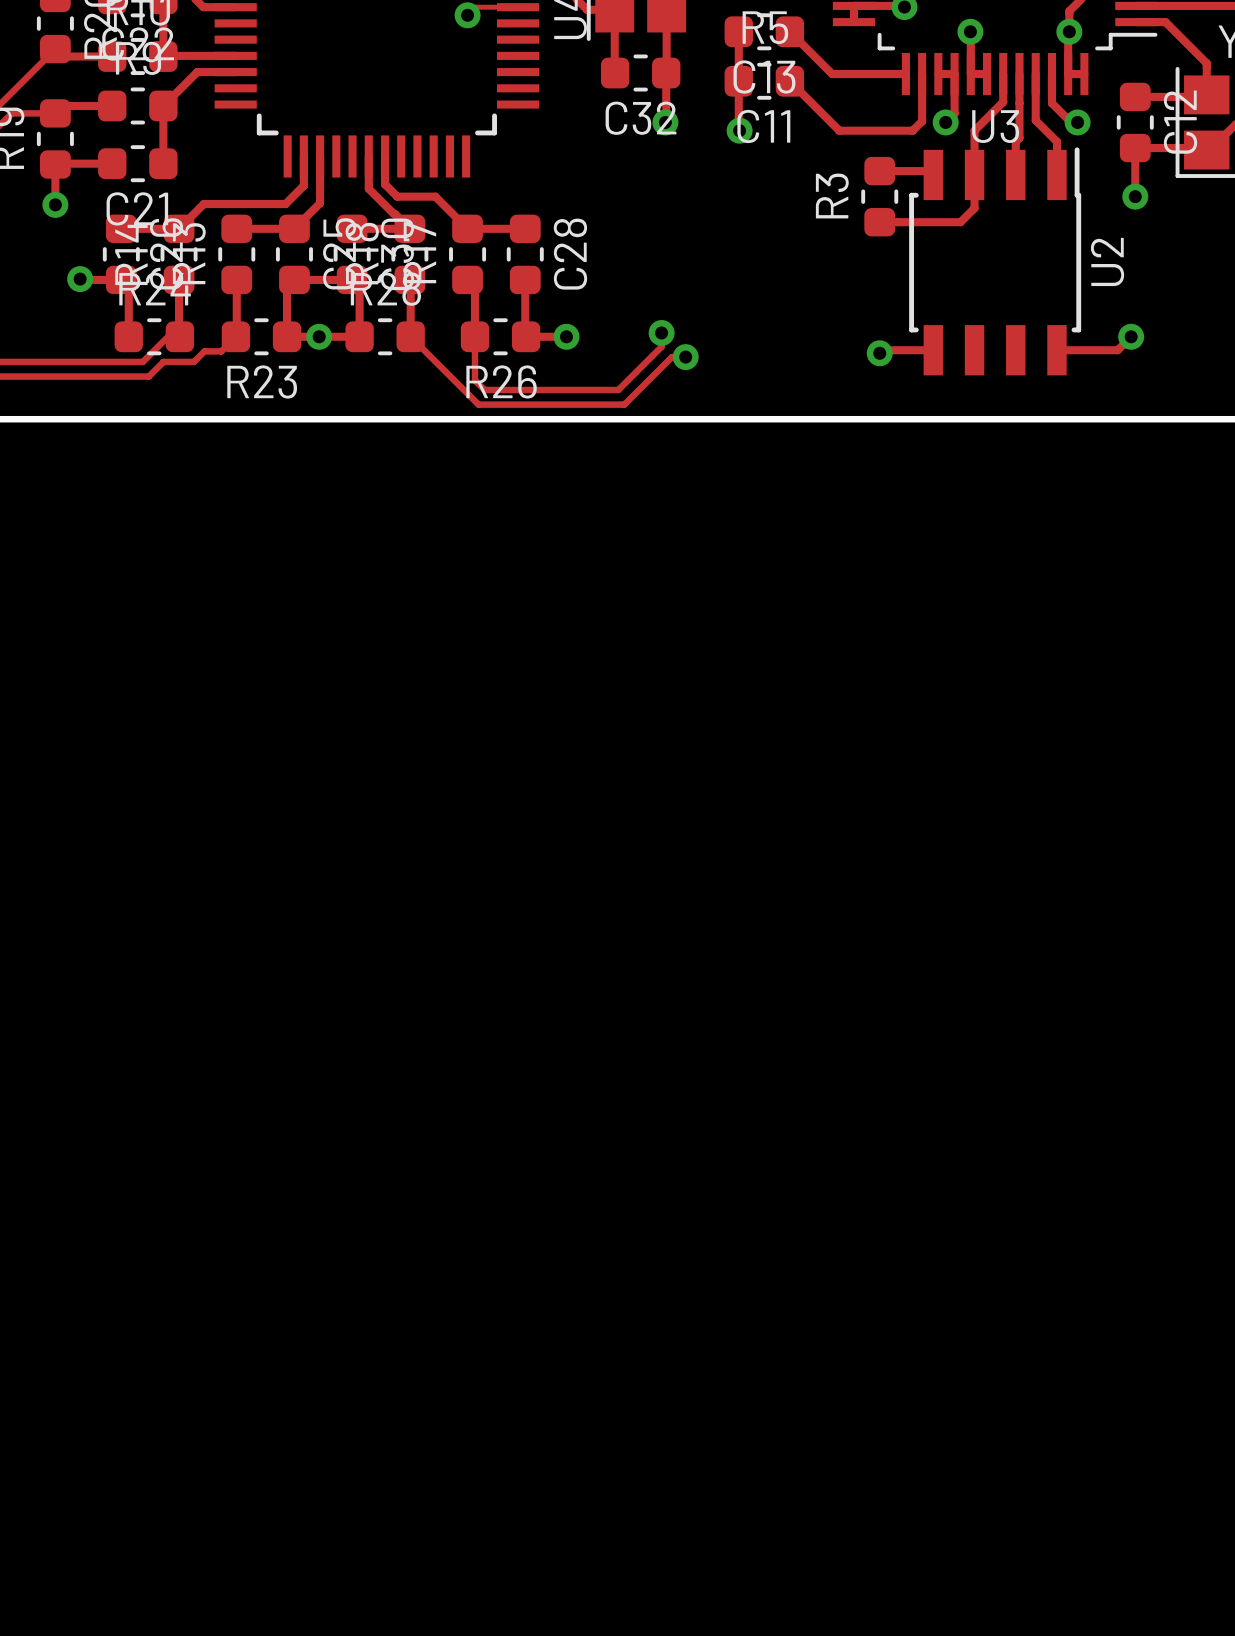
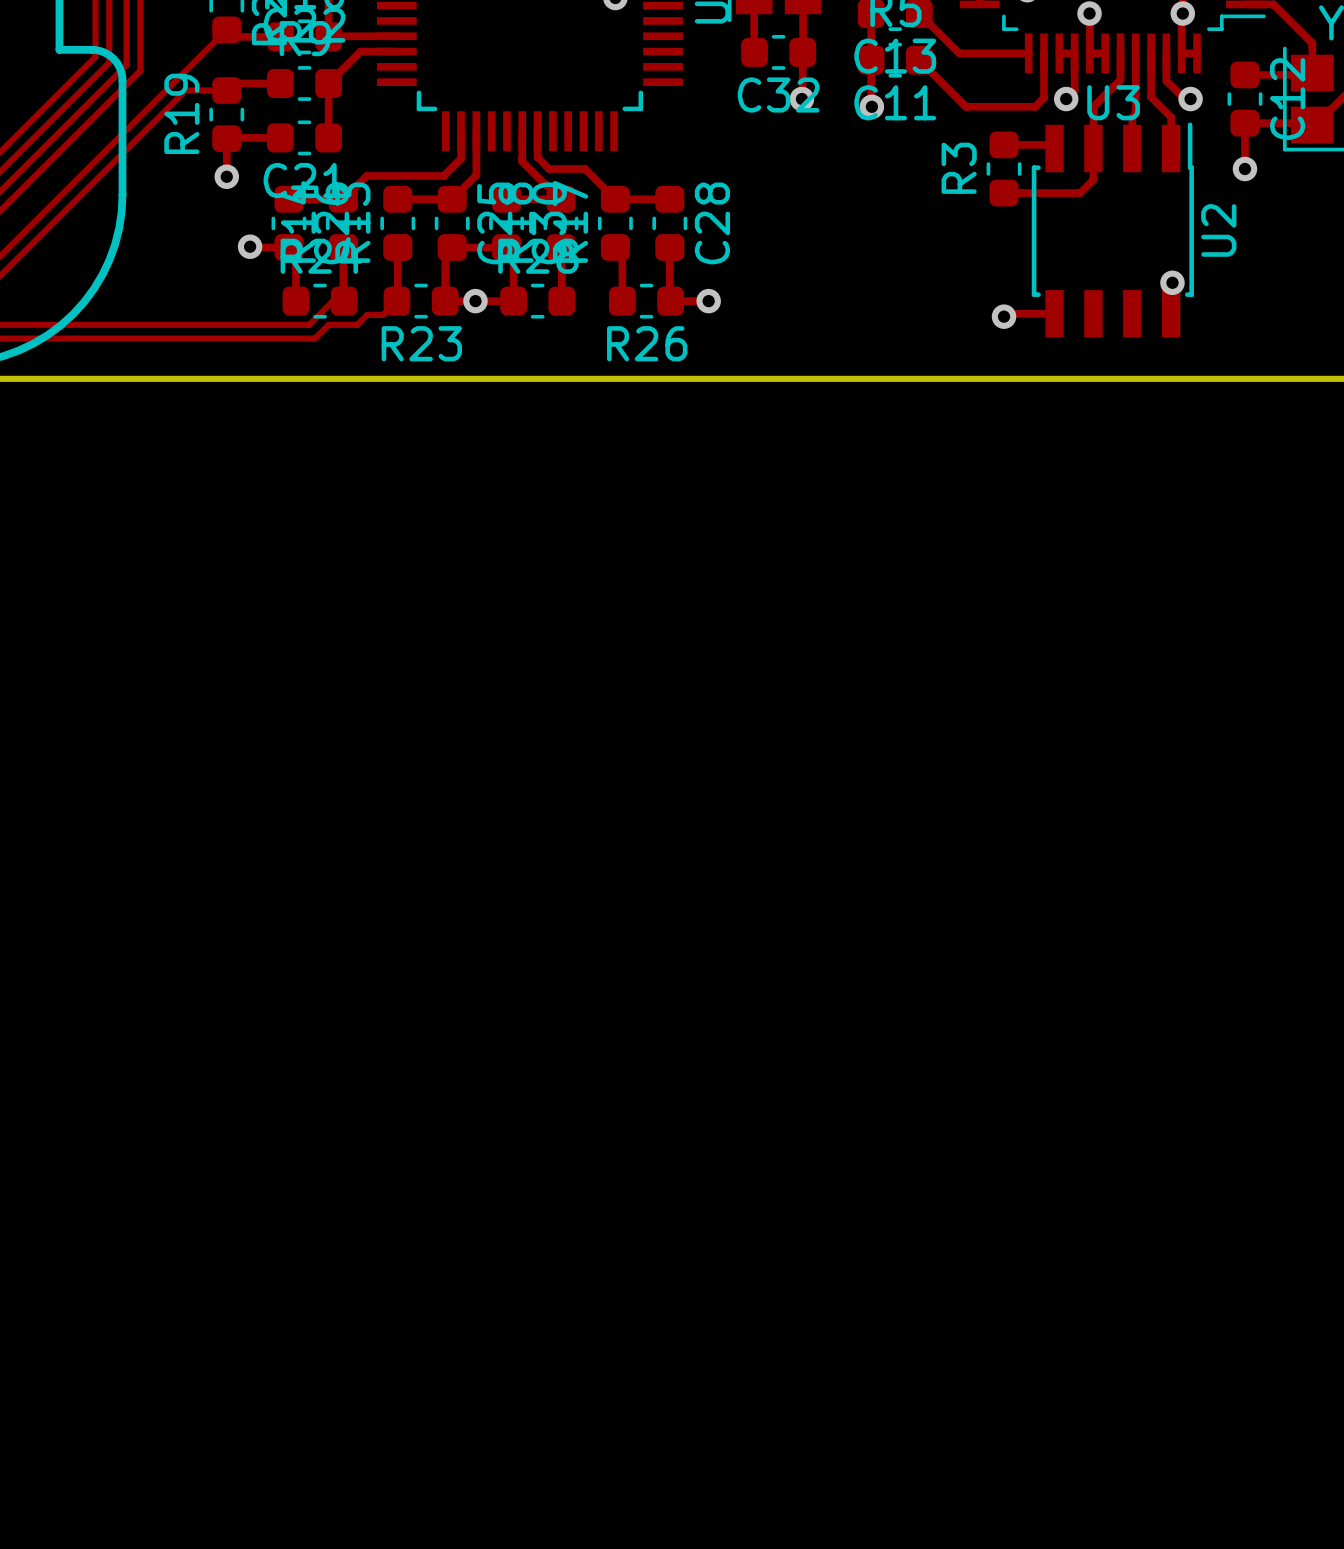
track: (661, 332) (661, 346) (618, 390) (484, 390) (474, 380) (474, 336) -> none
via: (661, 332) -> none
track: (410, 336) (478, 404) (624, 404) (671, 357) (685, 357) -> none
track: (1131, 336) (1117, 350) (1056, 350) -> none
via position: (1131, 336) -> (1172, 282)
via: (685, 357) -> none

